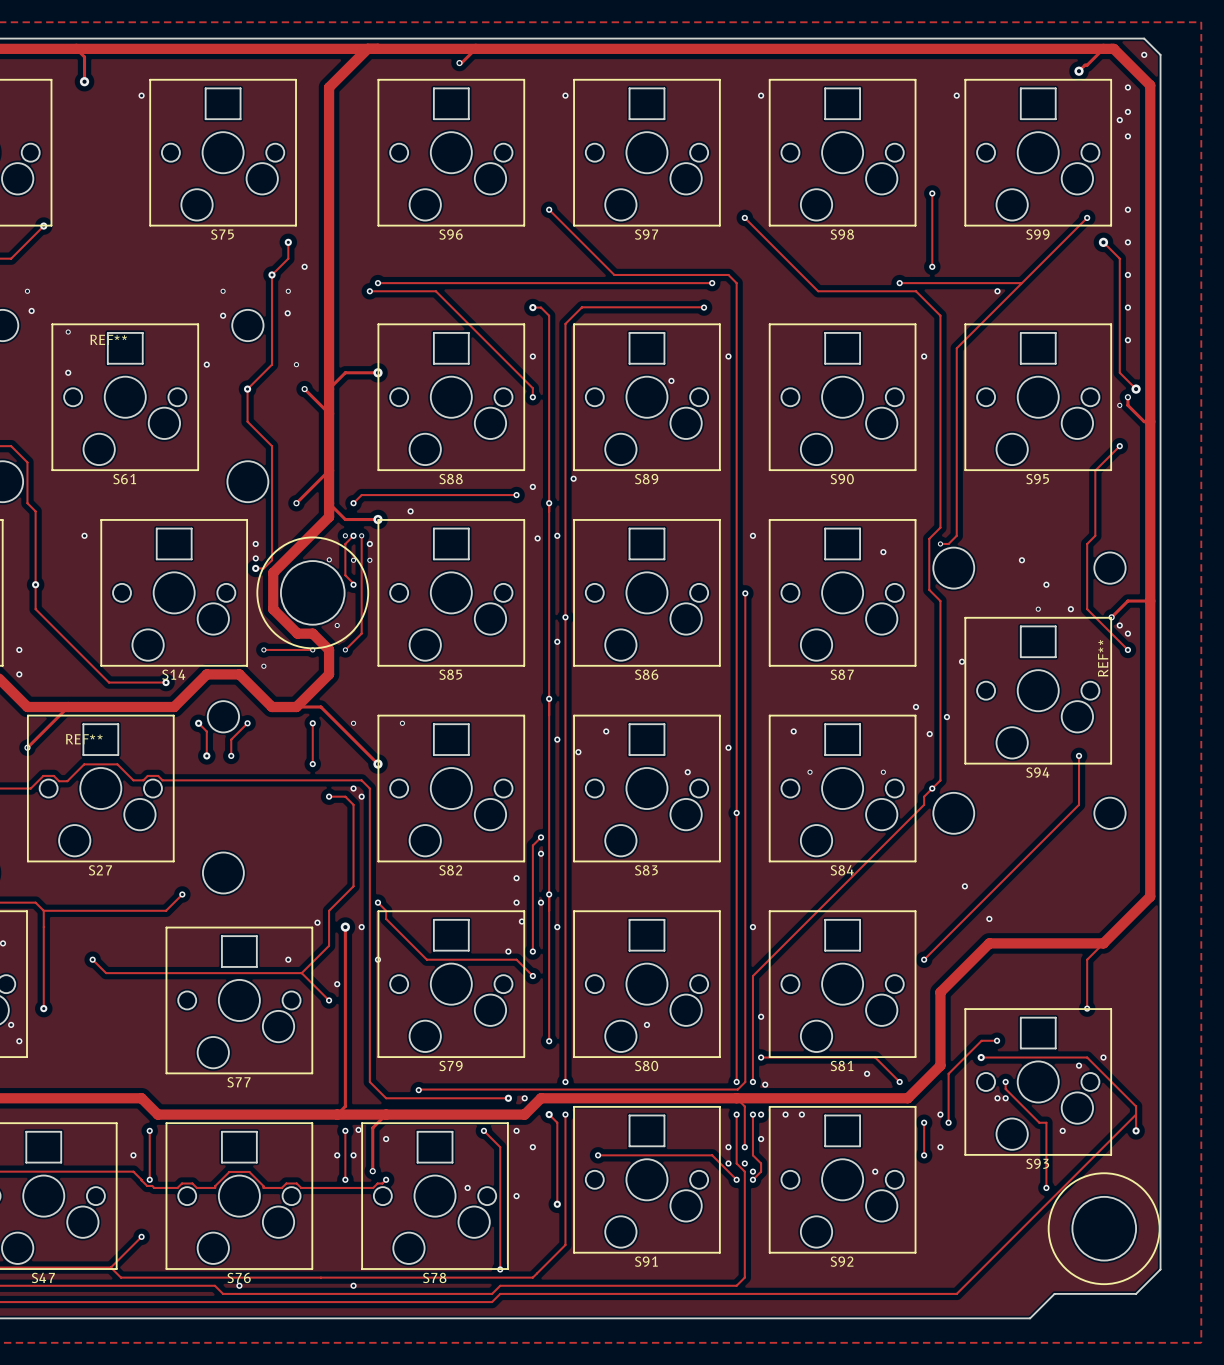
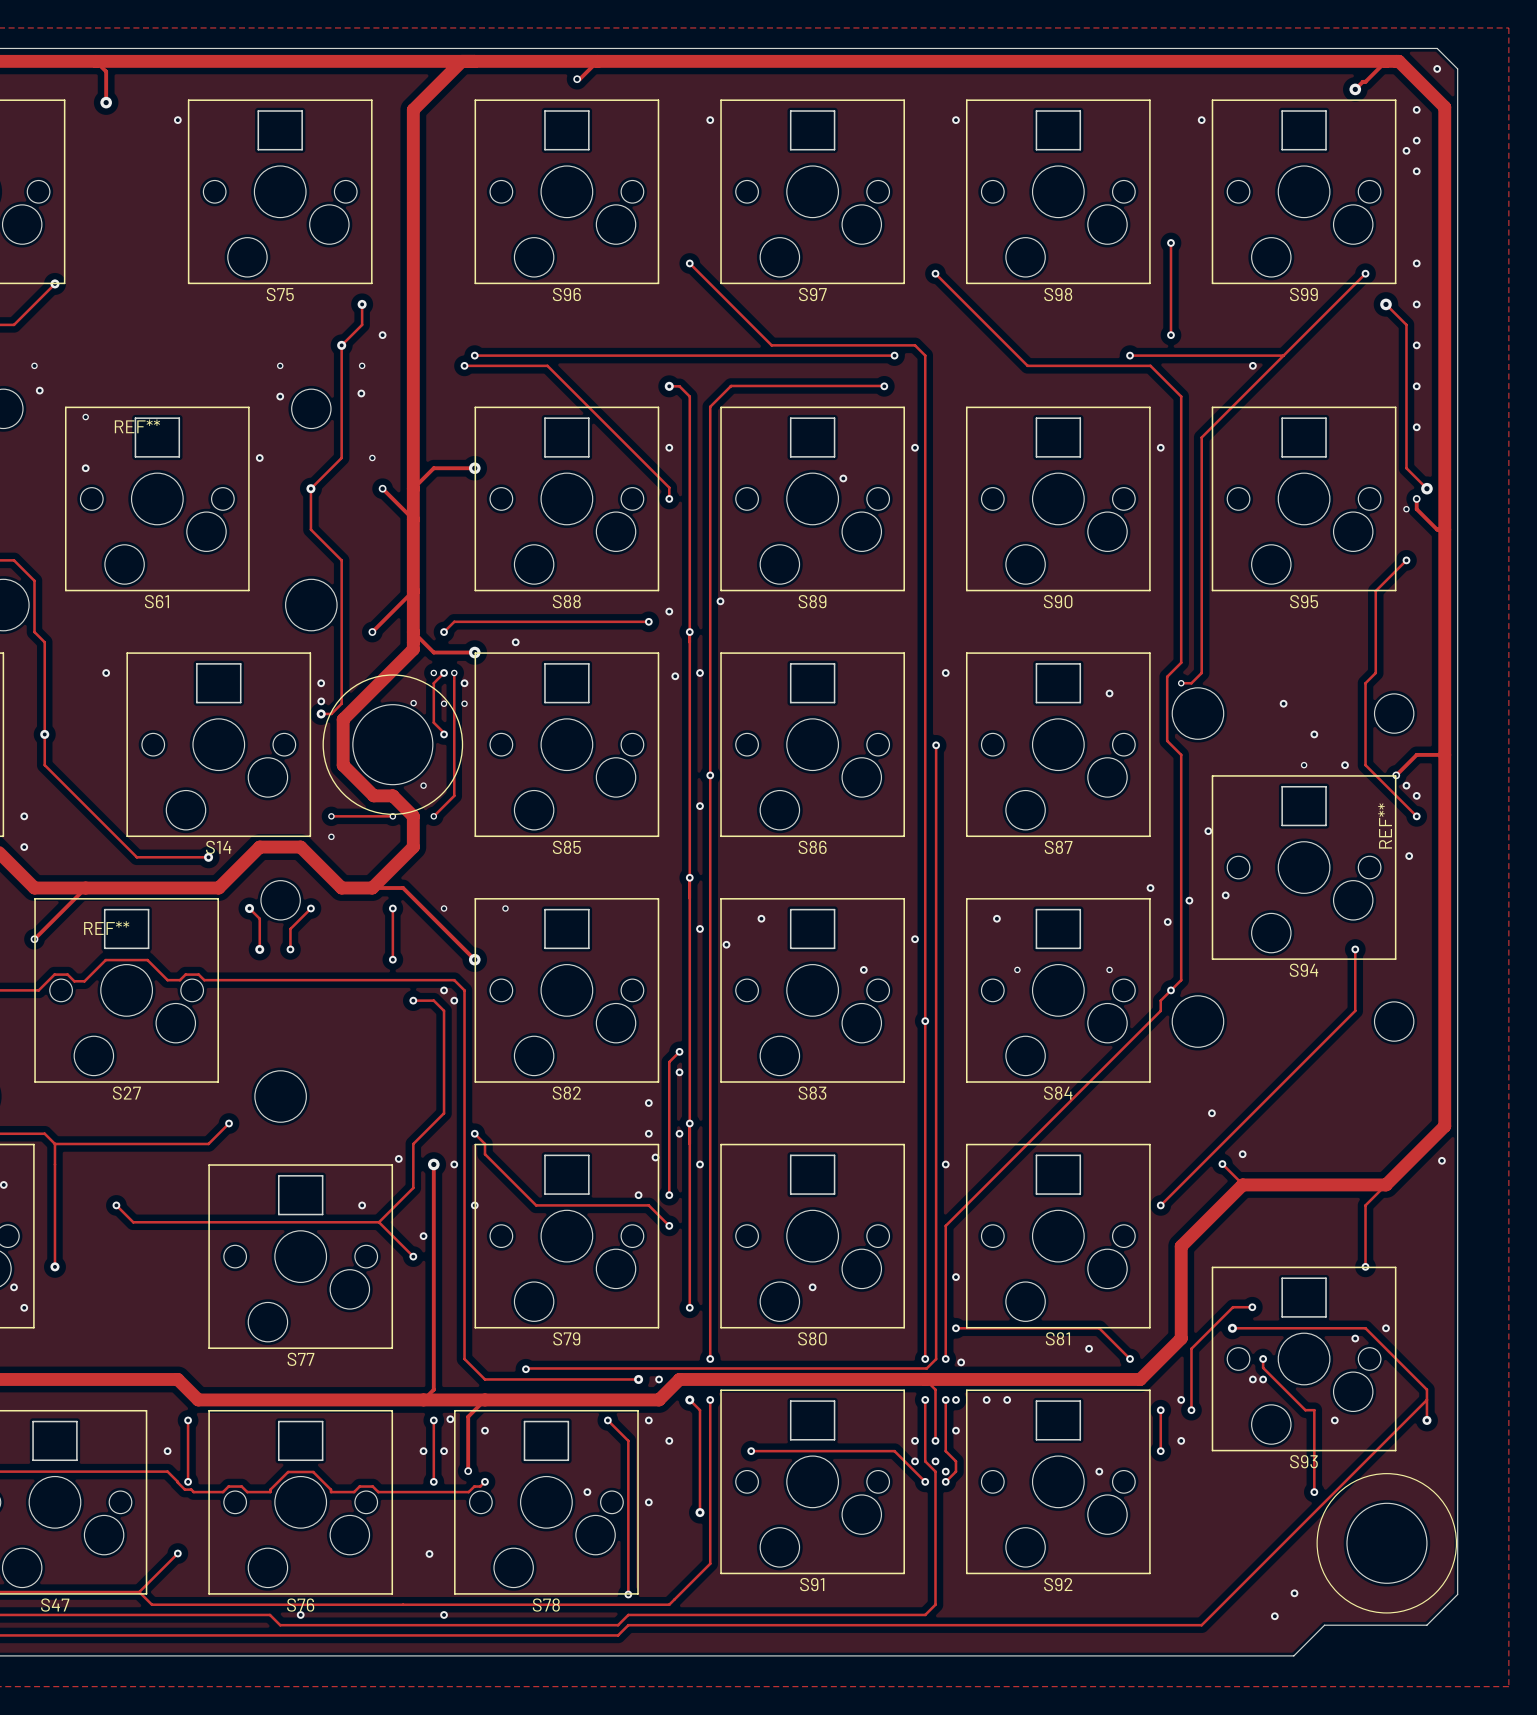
via: none -> (1409, 856)
via: none -> (1225, 895)
via: none -> (1441, 1160)
track: none -> (1222, 1164) (1242, 1184)
via: none -> (1222, 1164)
via: none -> (429, 1553)
via: none -> (1294, 1593)
via: none -> (1274, 1616)

